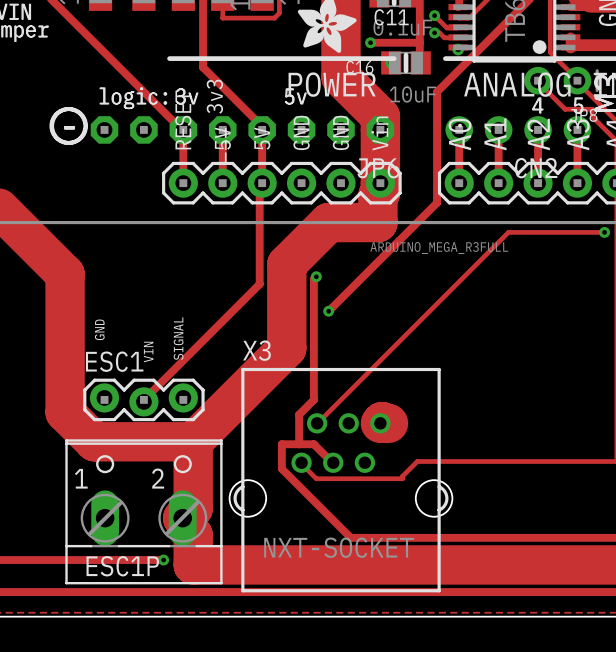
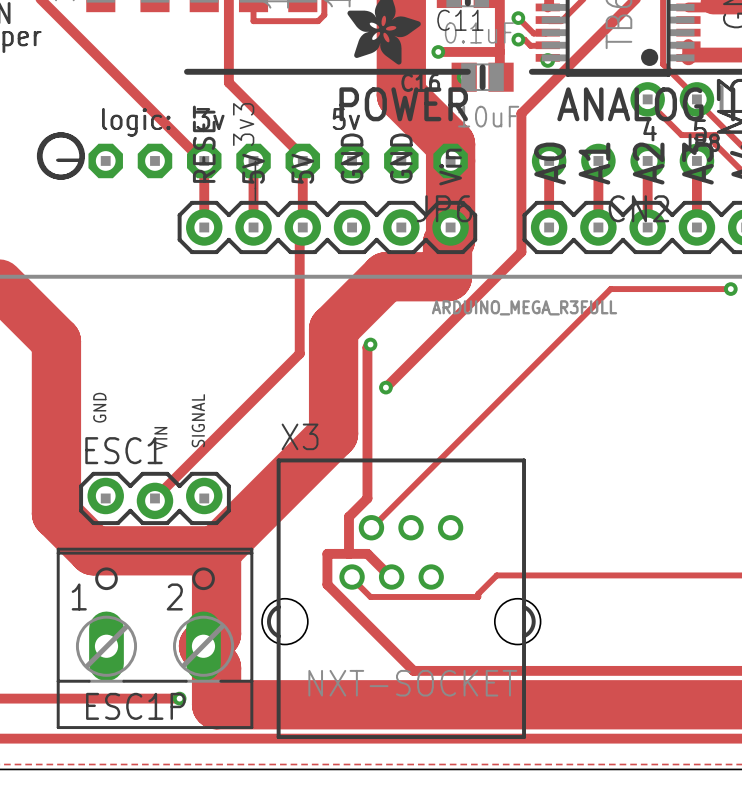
track: (390, 421) (380, 423) -> none

